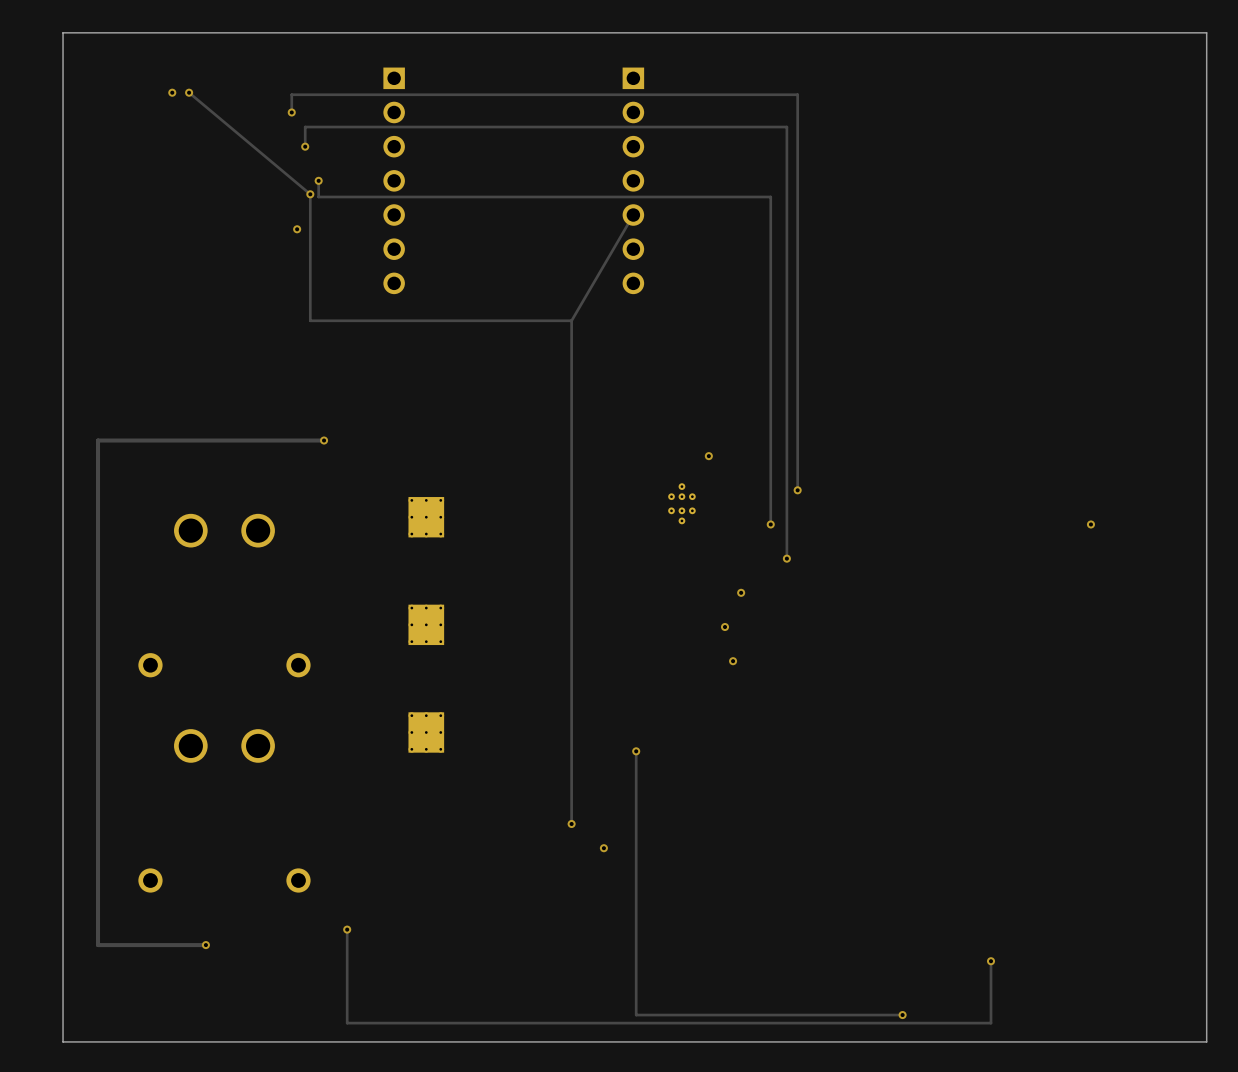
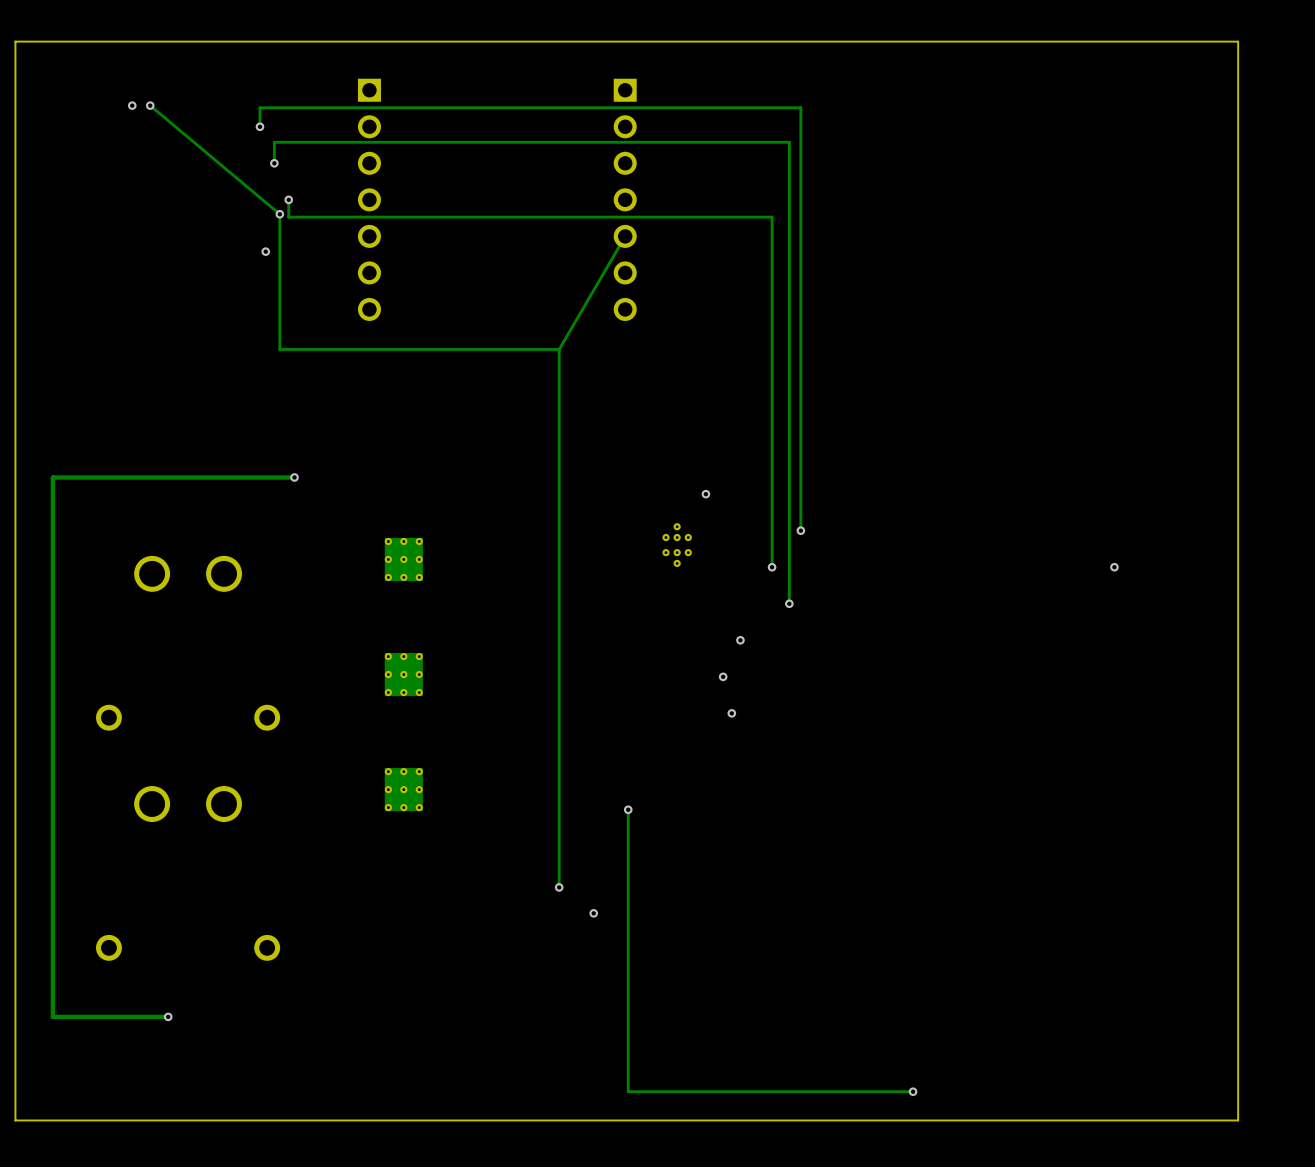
track: (347, 929) (347, 1023) (991, 1023) (991, 961) -> none
via: (347, 929) -> none
via: (991, 961) -> none

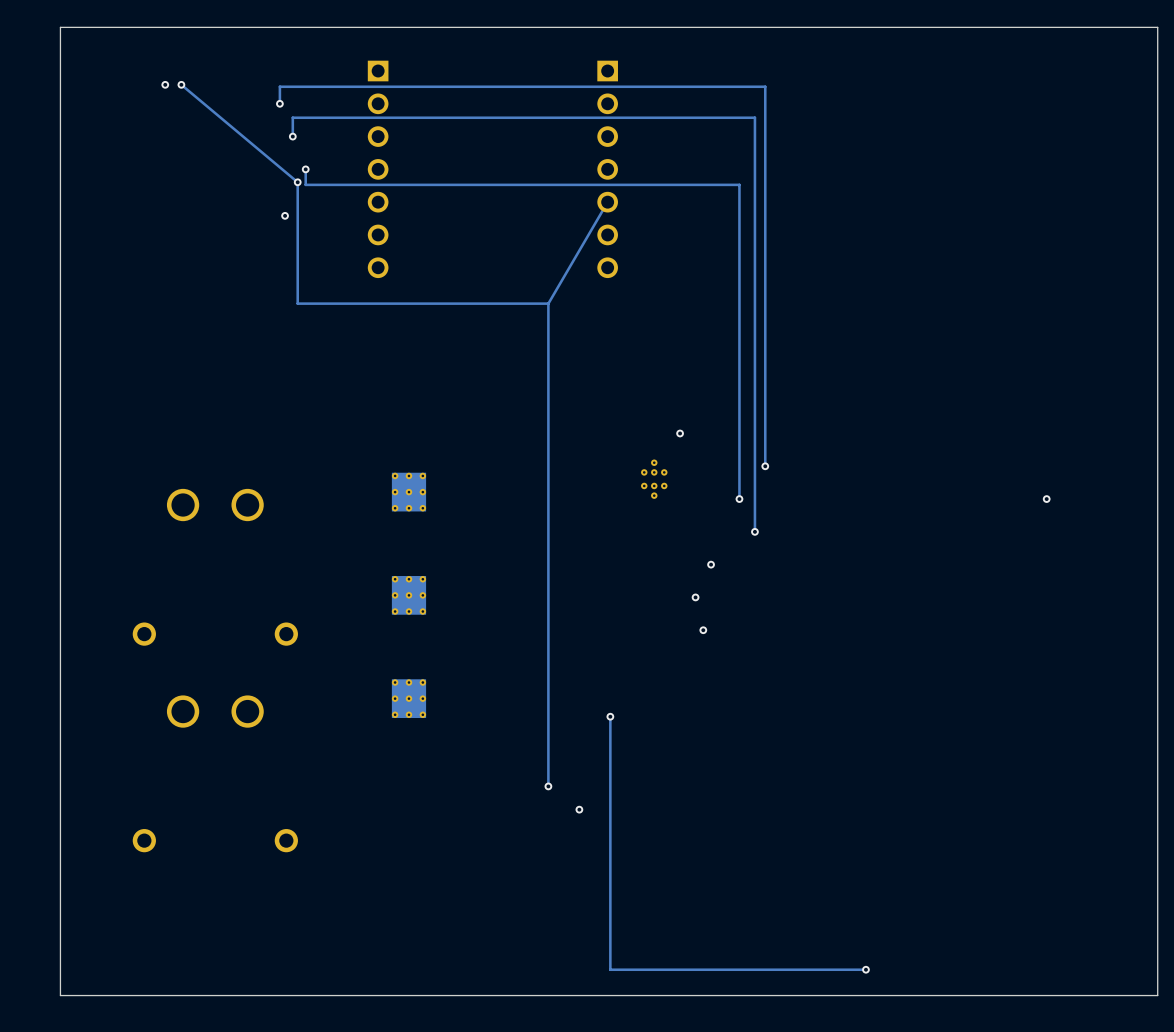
track: (294, 477) (52, 477) (52, 1016) (168, 1016) -> none
via: (294, 477) -> none
via: (168, 1016) -> none

